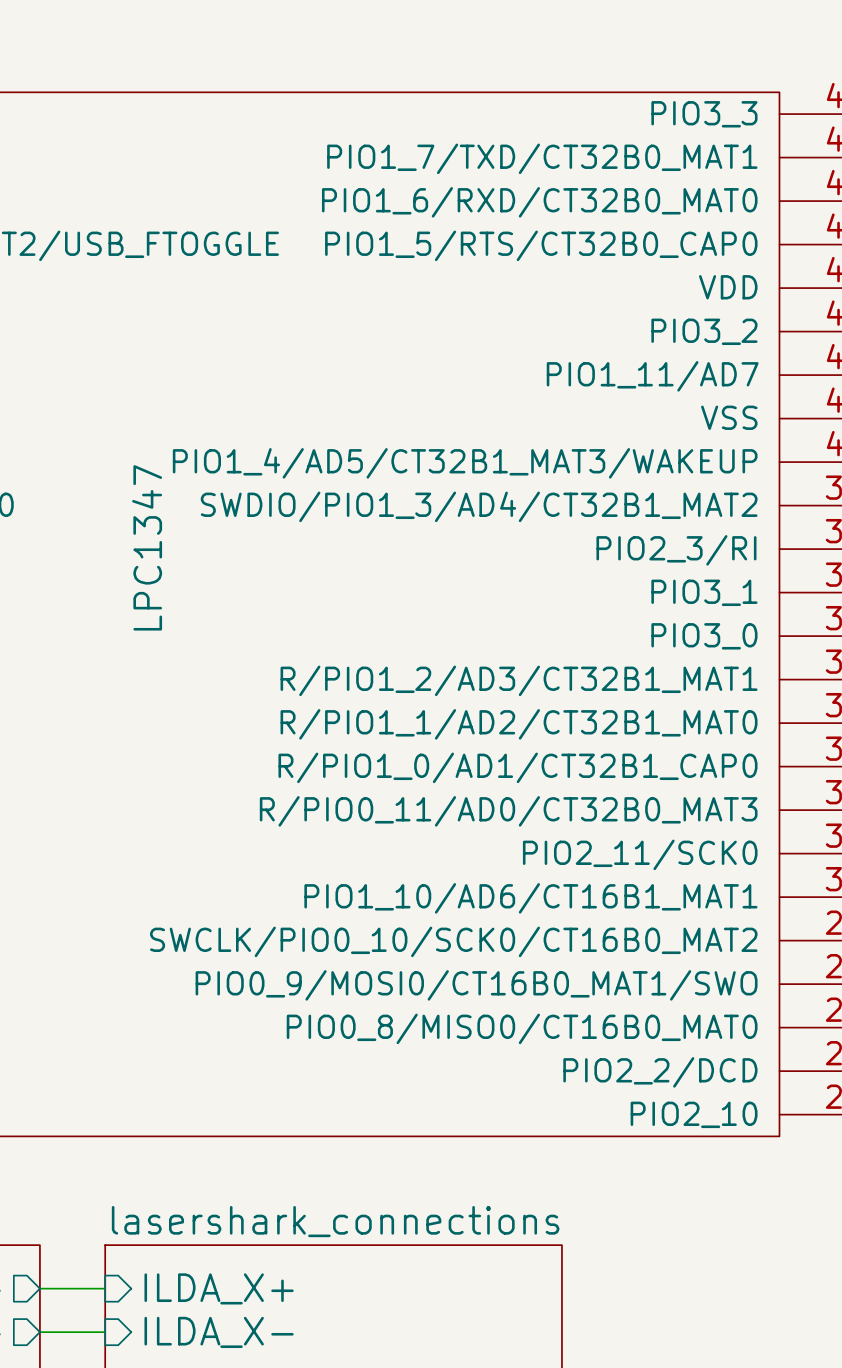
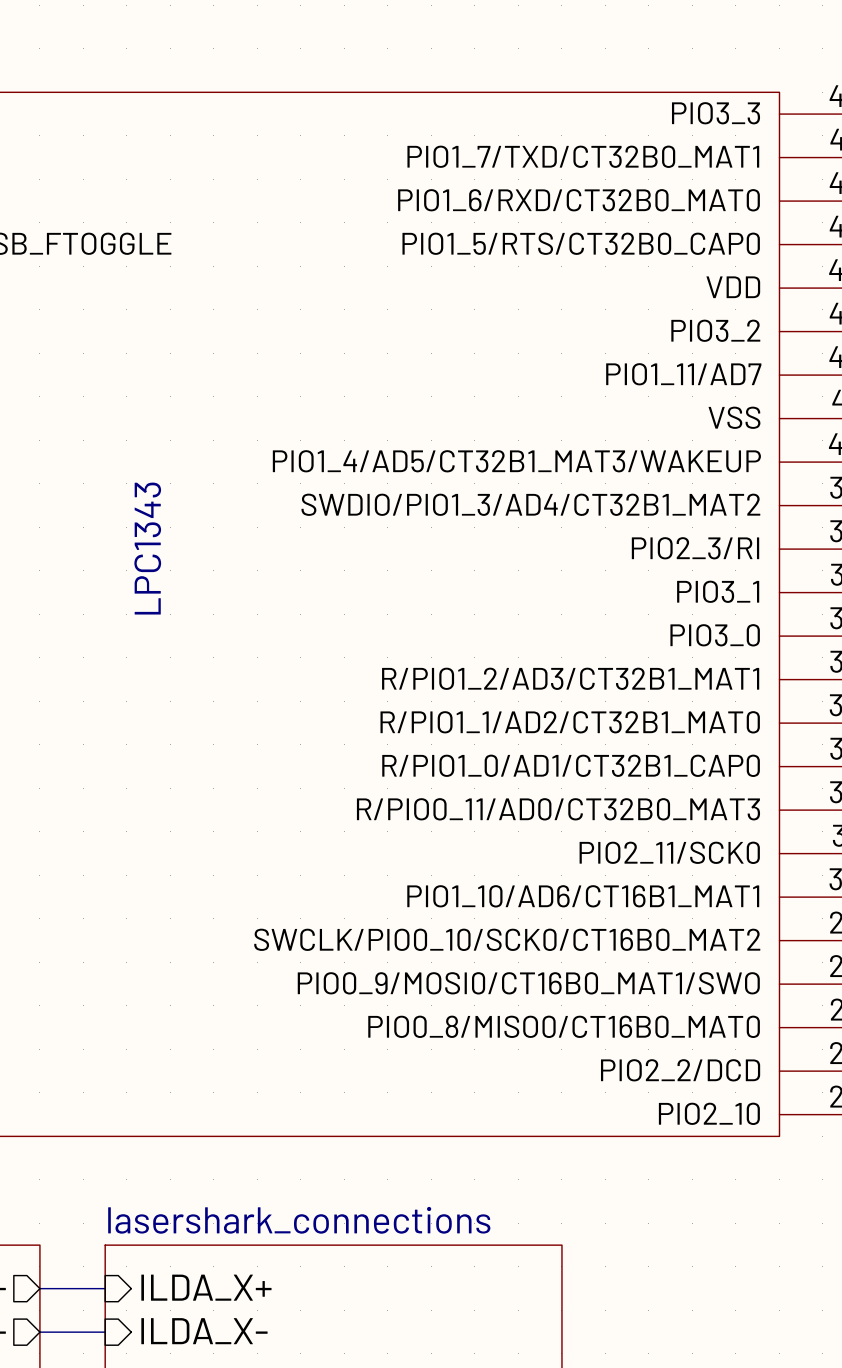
part value: LPC1347 (147, 547) -> LPC1343 (147, 548)

